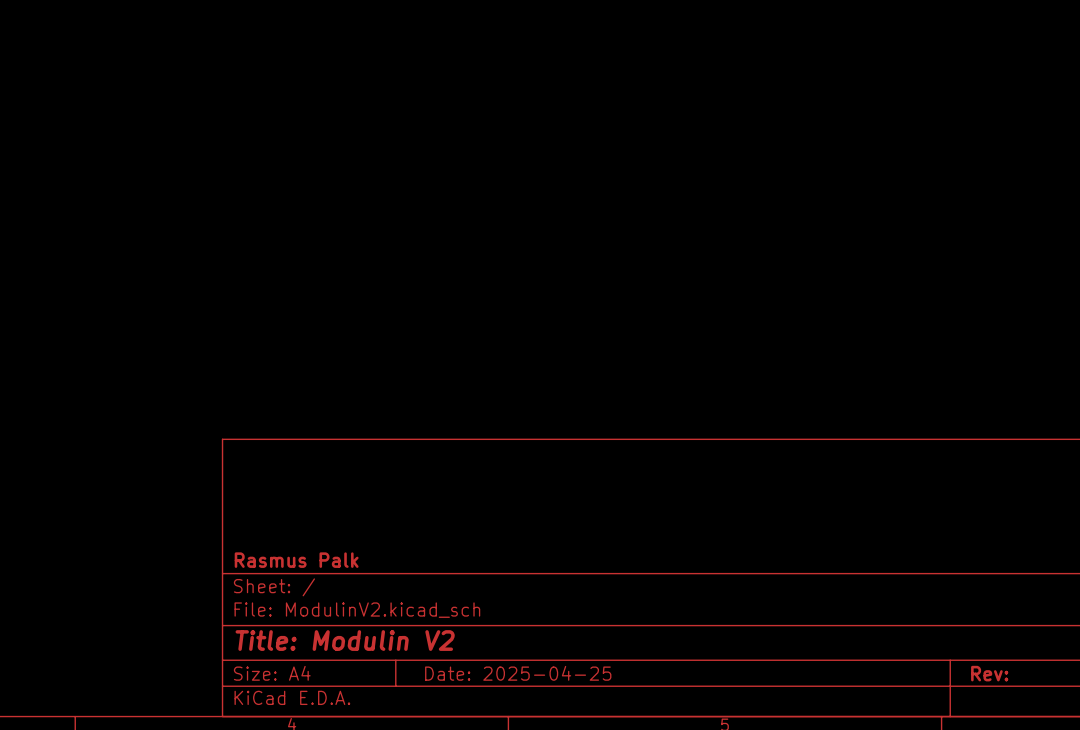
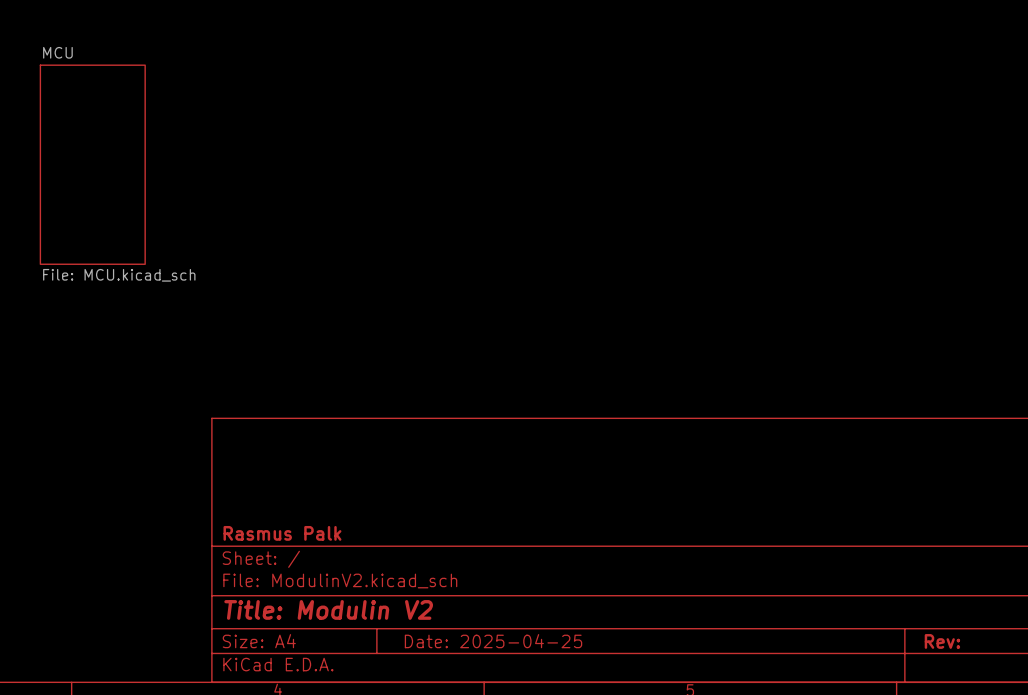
sheet MCU: none -> File: MCU.kicad_sch (92, 164)

